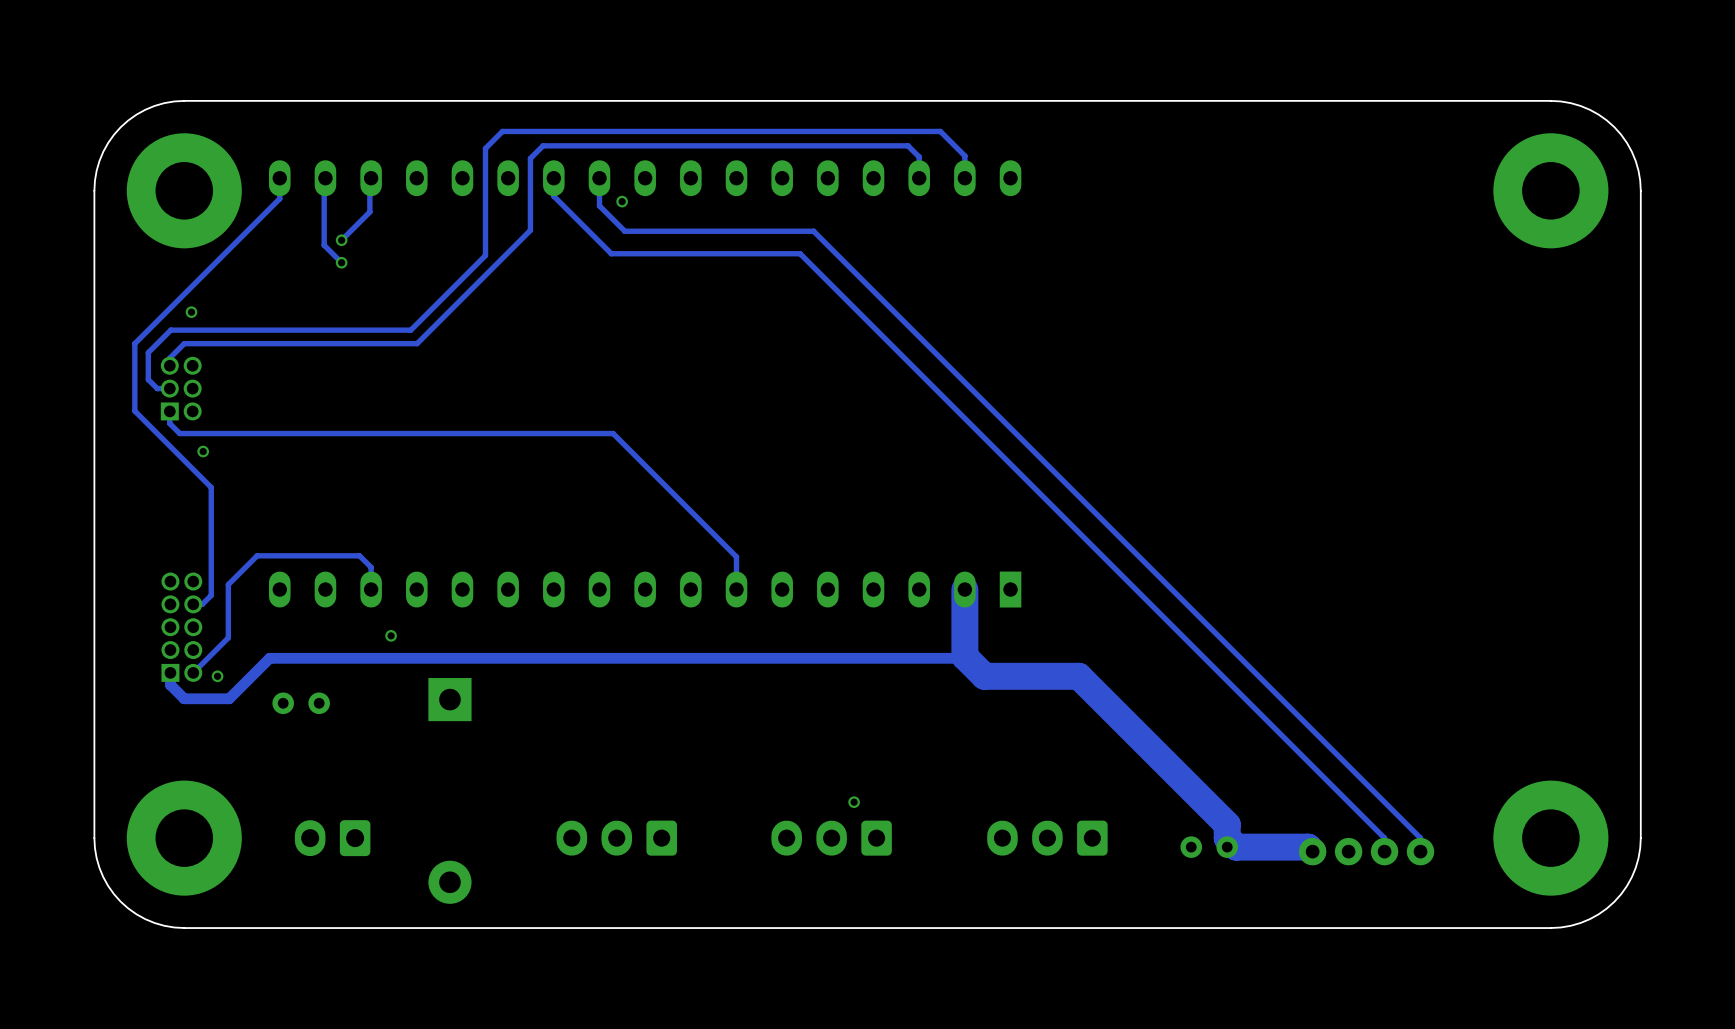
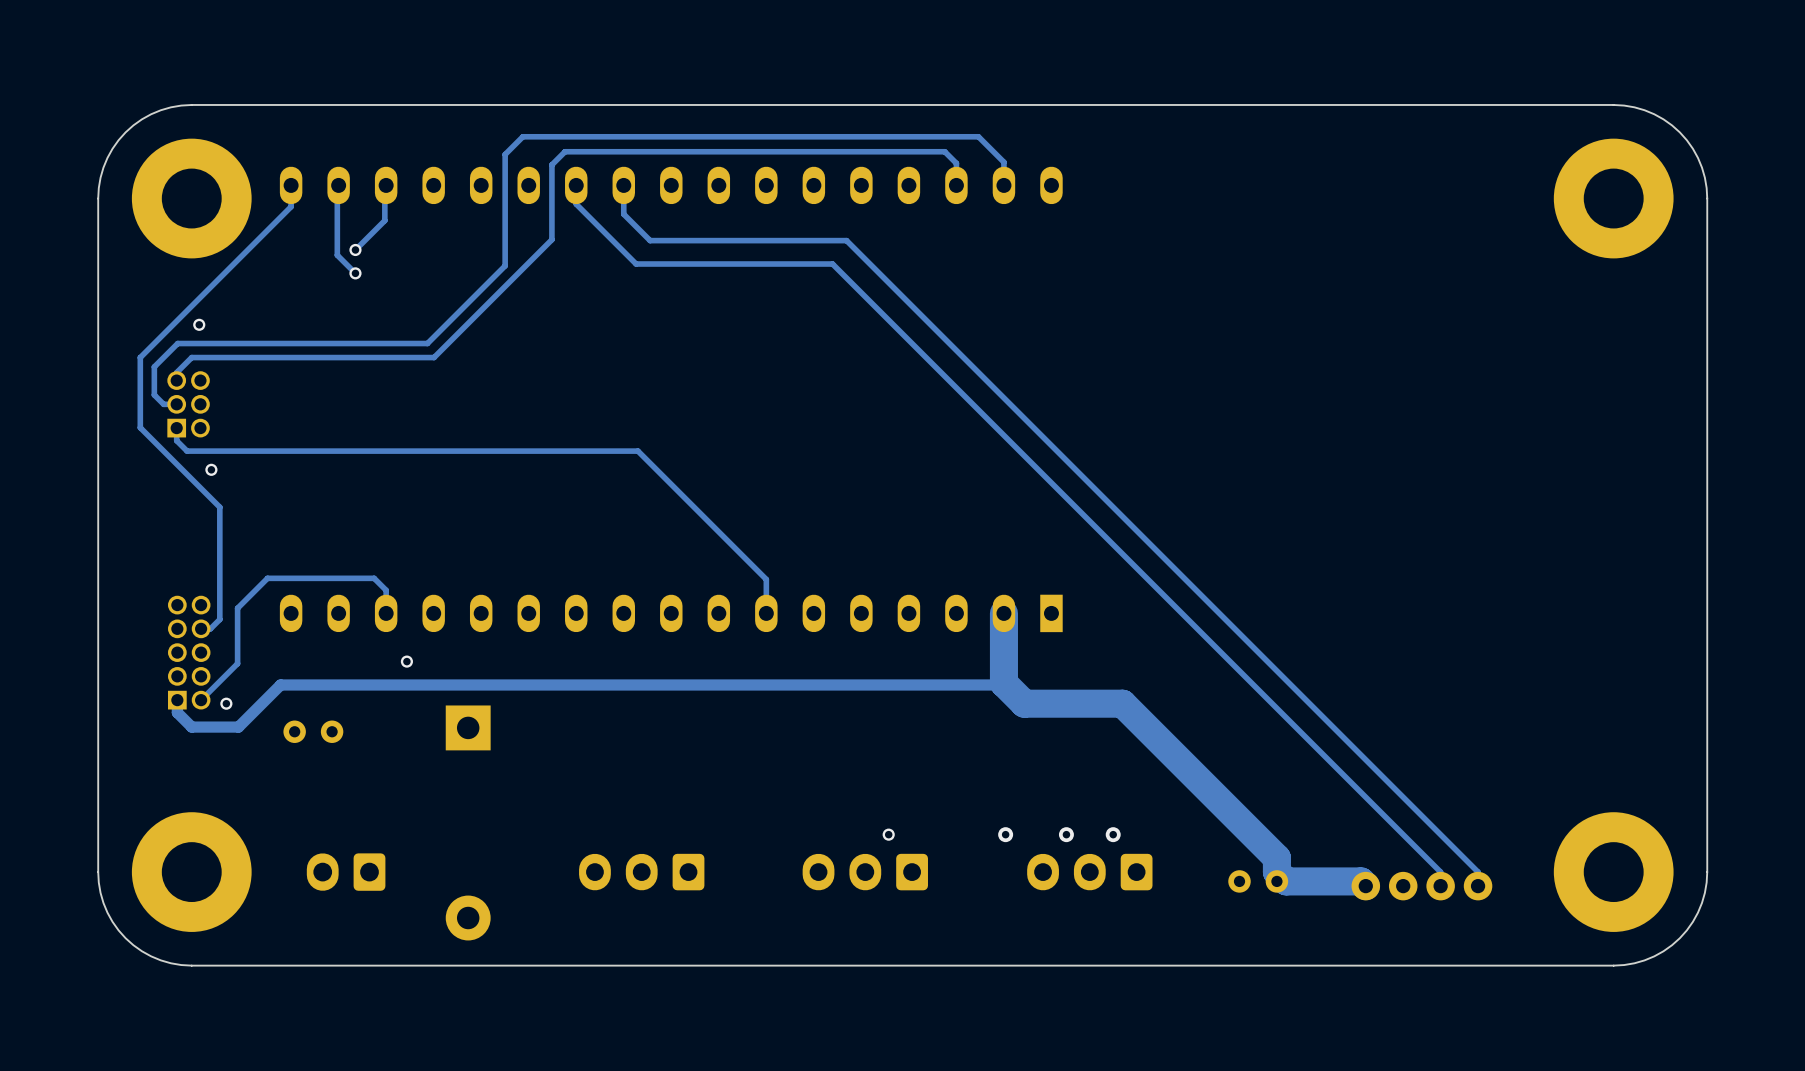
via: (622, 201) -> none
via: none -> (1005, 834)
via: none -> (1066, 834)
via: none -> (1113, 834)

